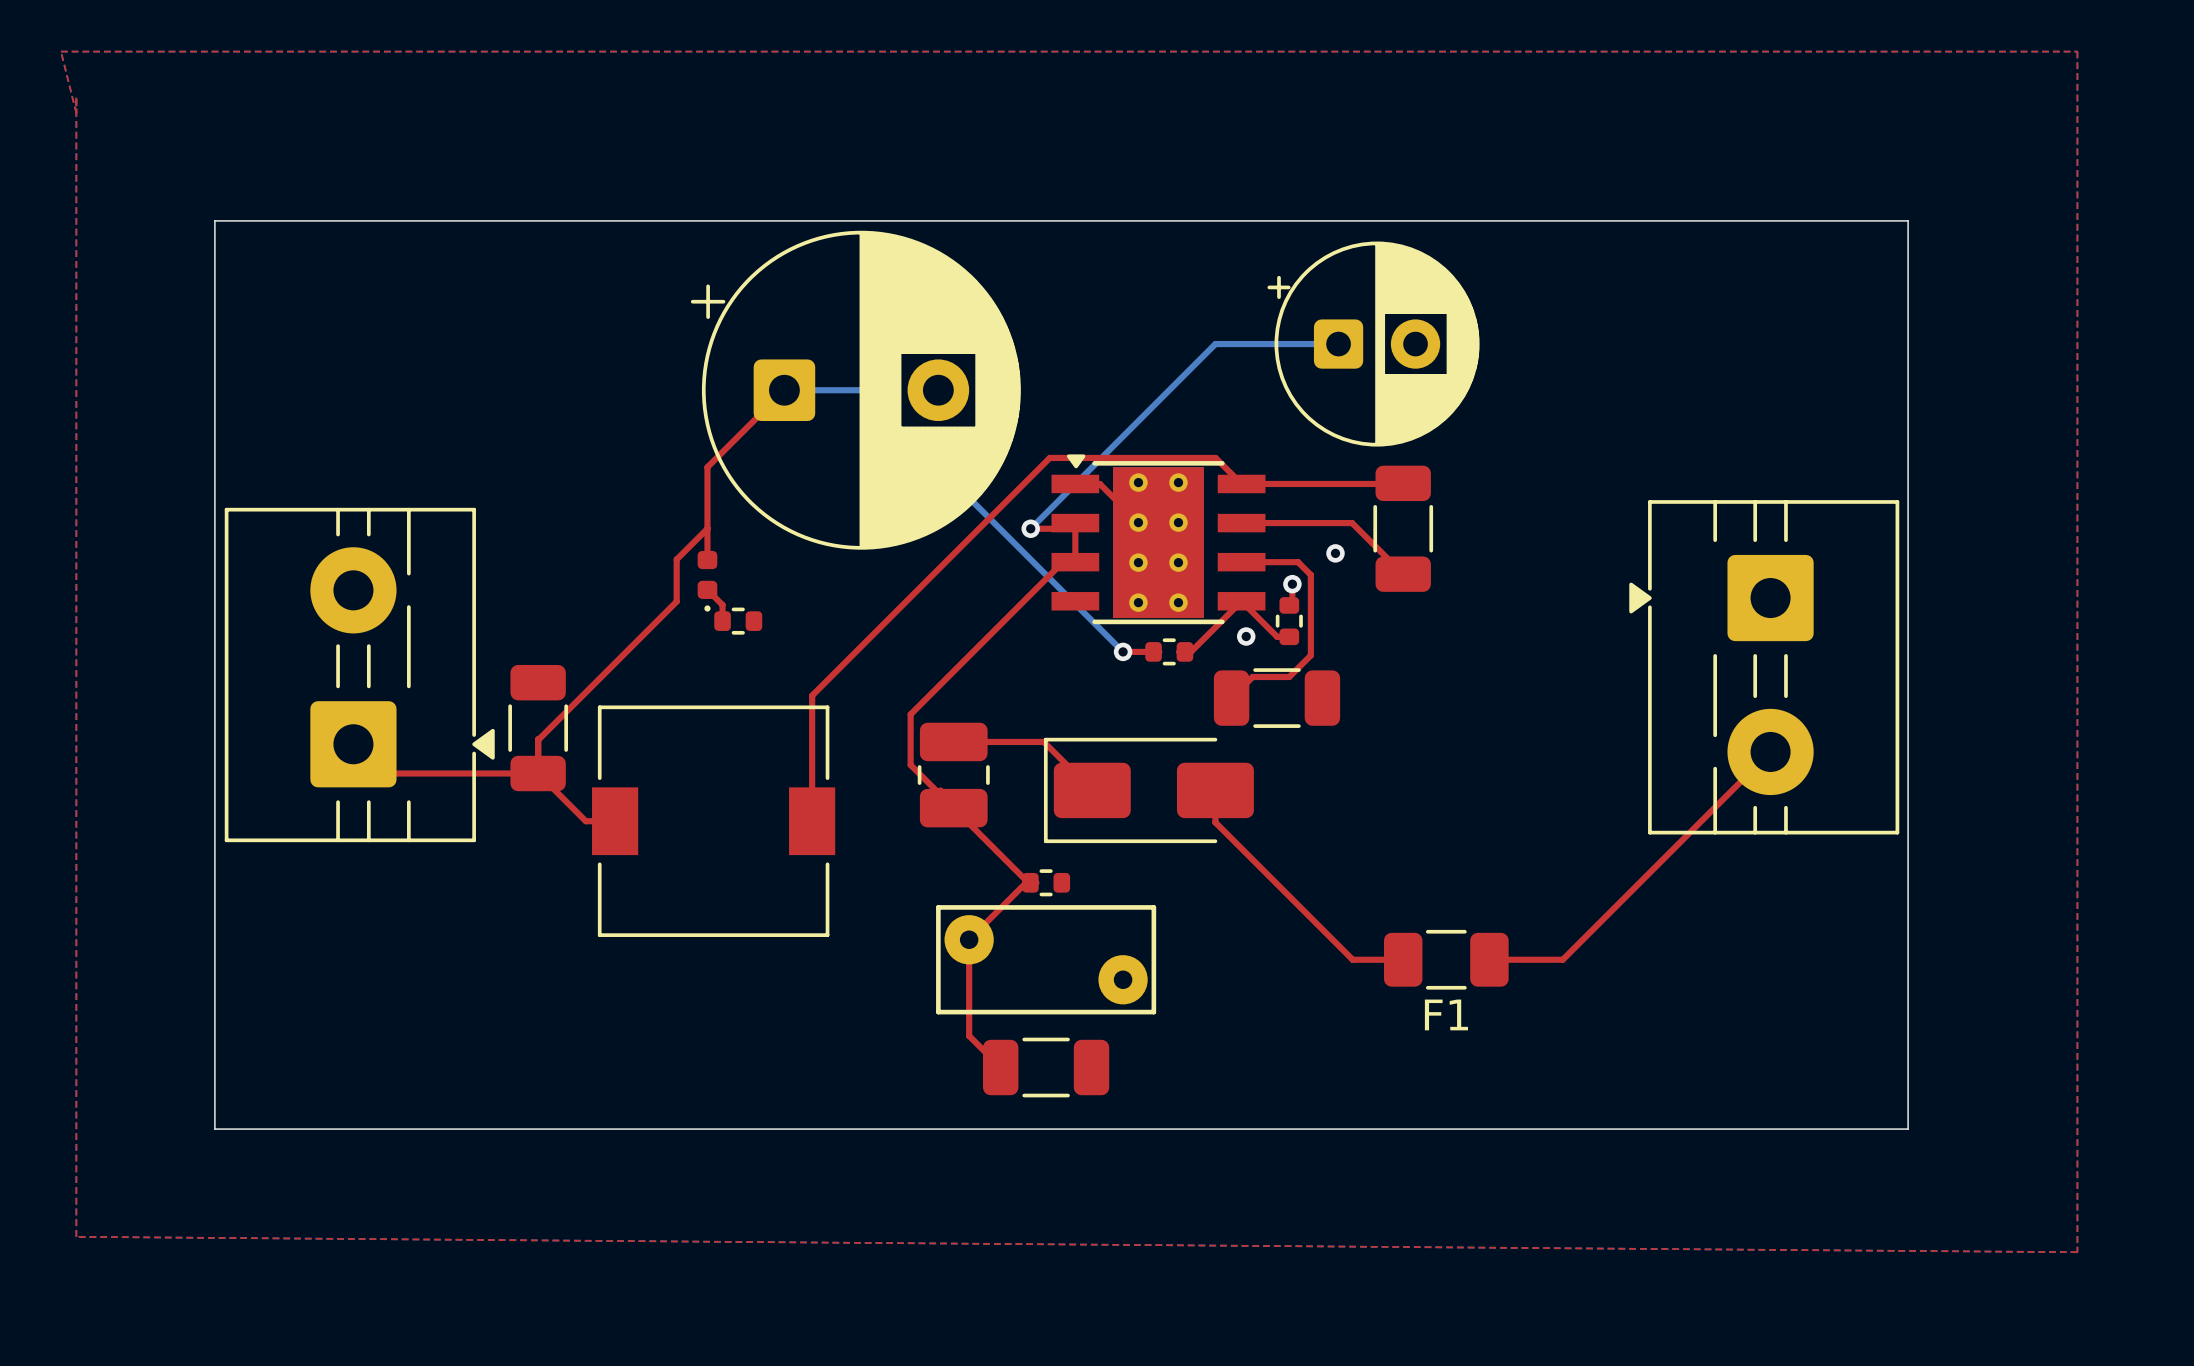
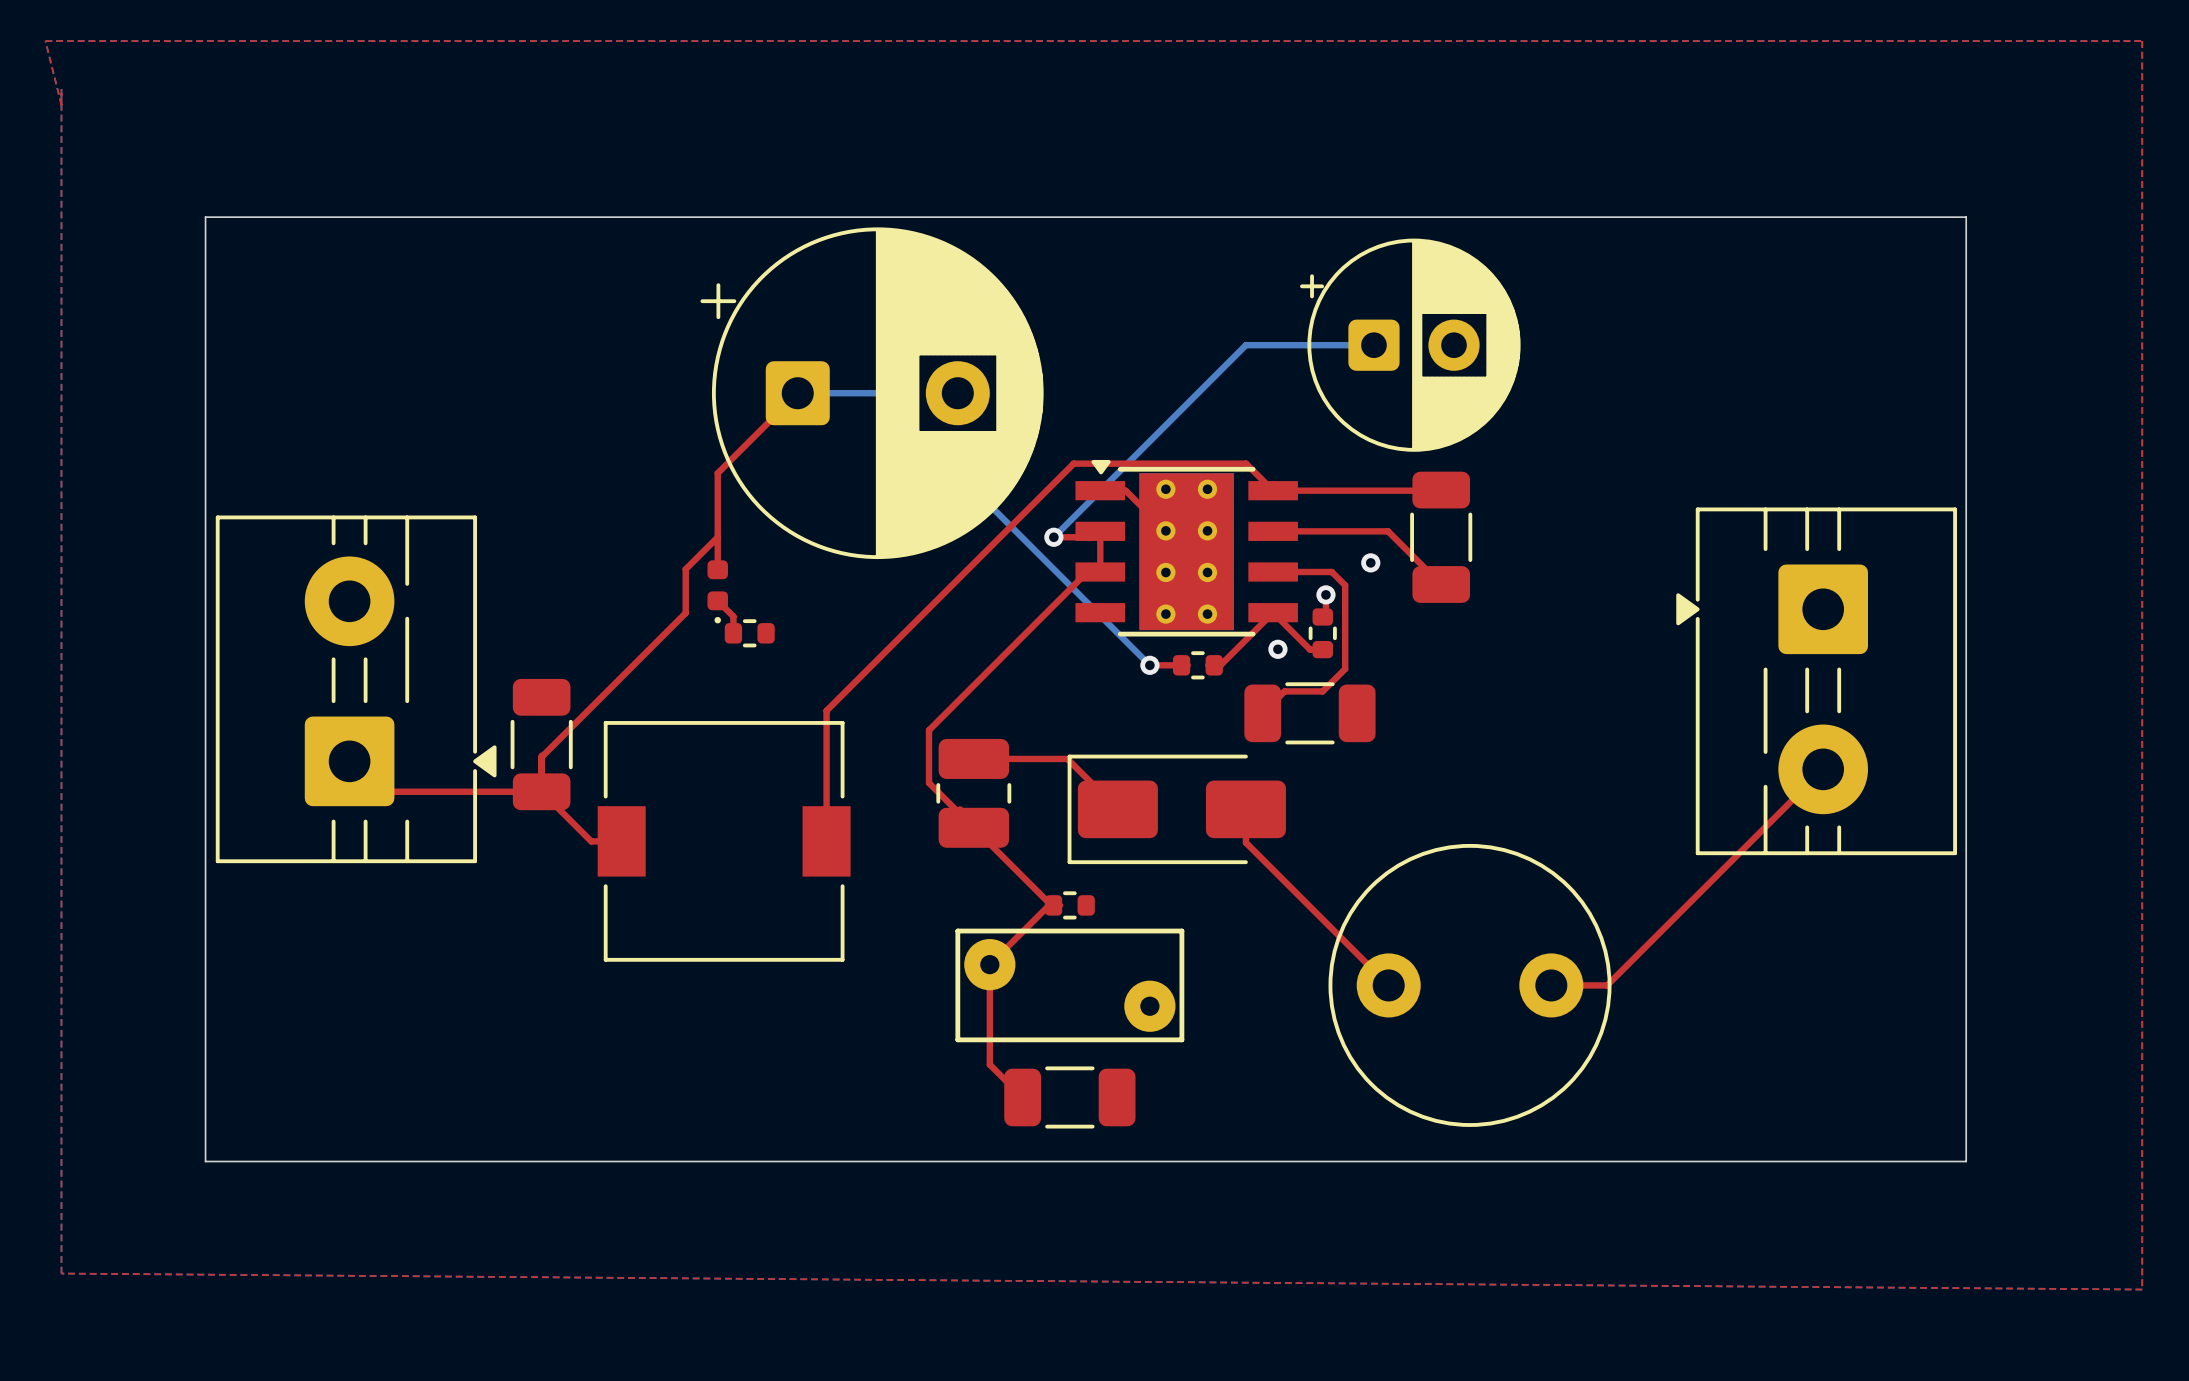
top track: (1352, 959) (1403, 959) -> none
part: none -> (1470, 985)
F1: (1446, 959) -> none

